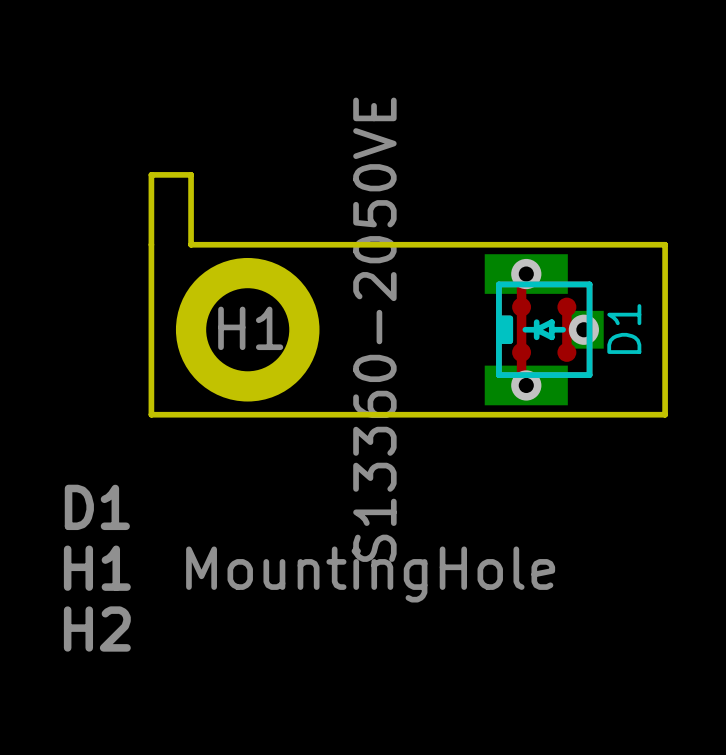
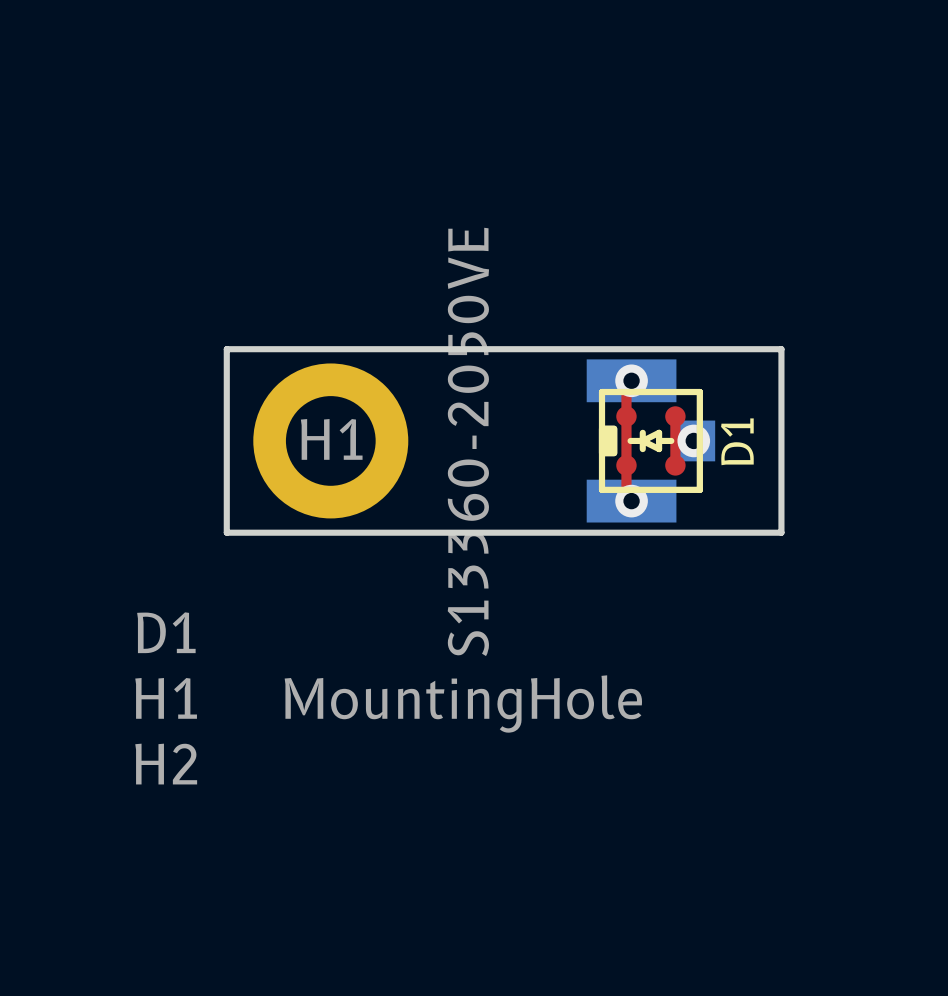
board edge: (151, 244) (151, 174) (191, 174) (191, 244) -> (226, 349) (269, 349)

